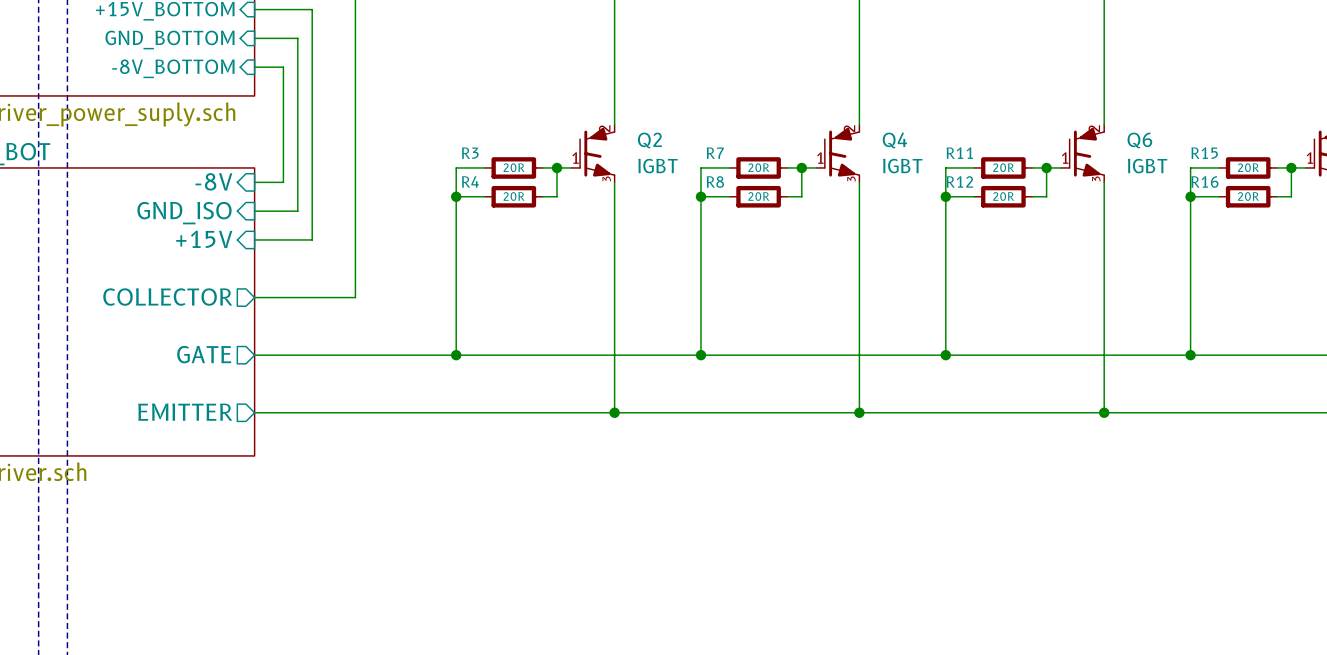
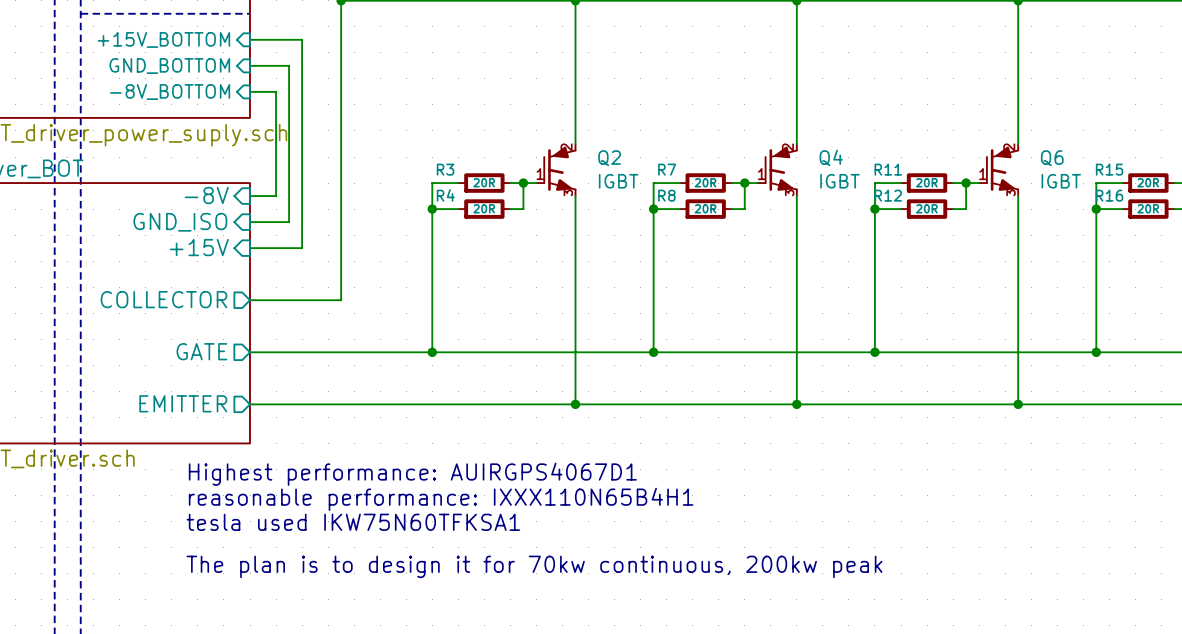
text: none -> Highest performance: AUIRGPS4067D1 (412, 474)
text: none -> reasonable performance: IXXX110N65B4H1 (441, 499)
text: none -> tesla used IKW75N60TFKSA1 (353, 522)
text: none -> The plan is to design it for 70kw continuous, 200kw peak (534, 566)

